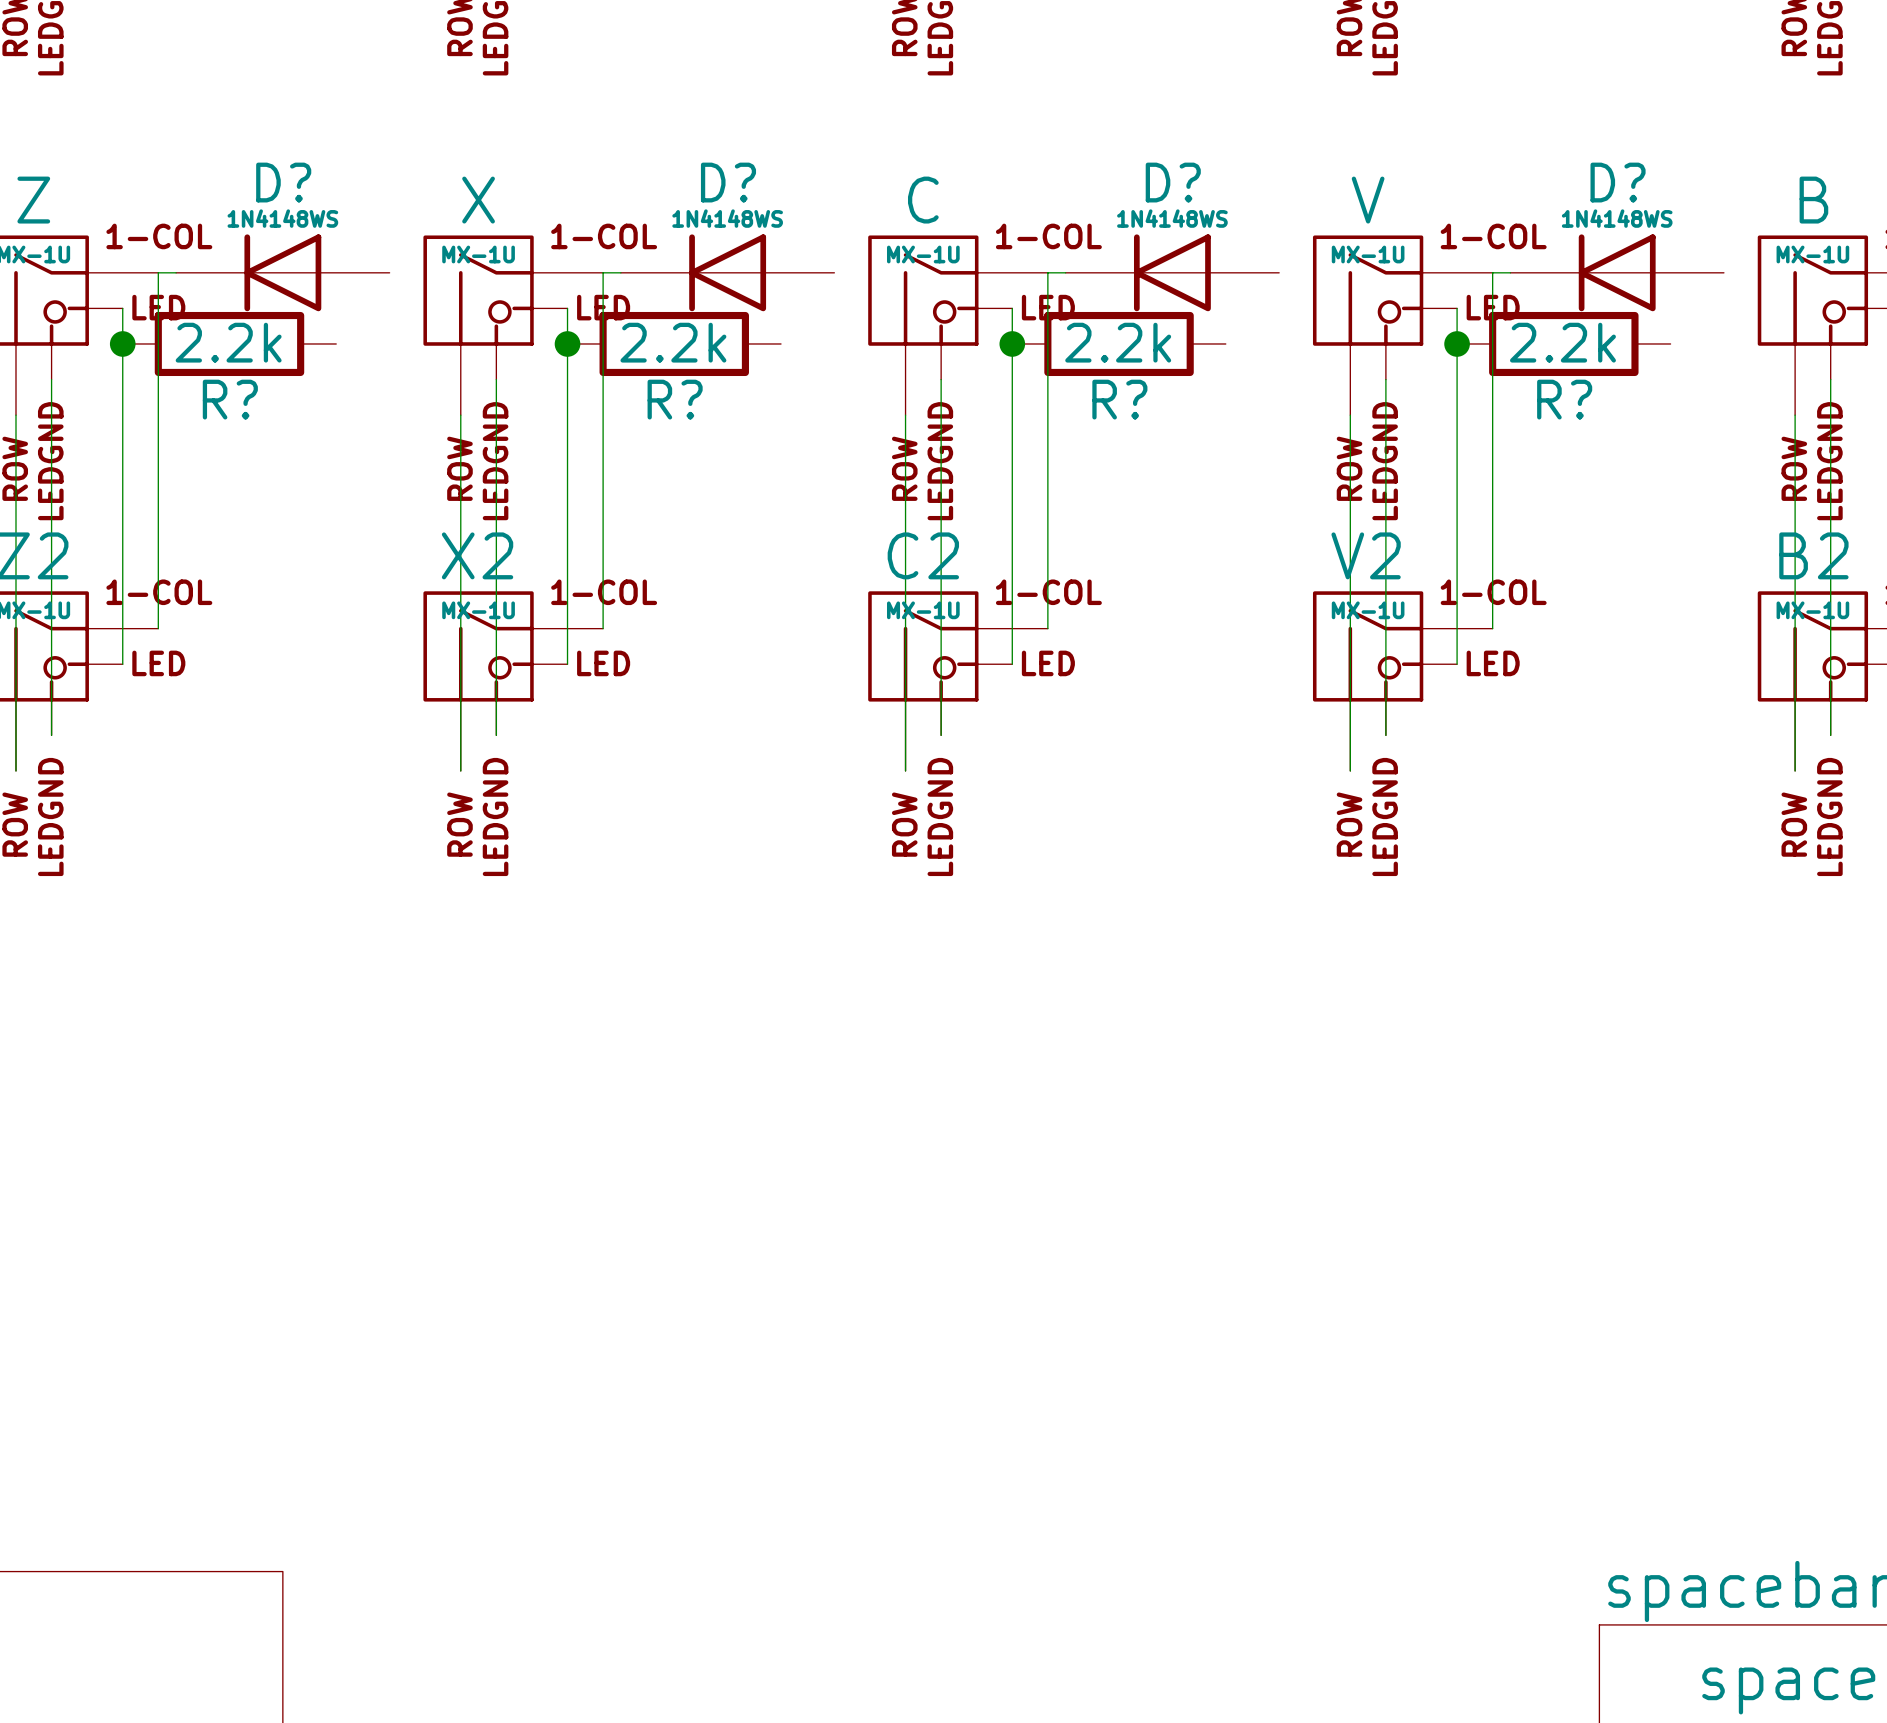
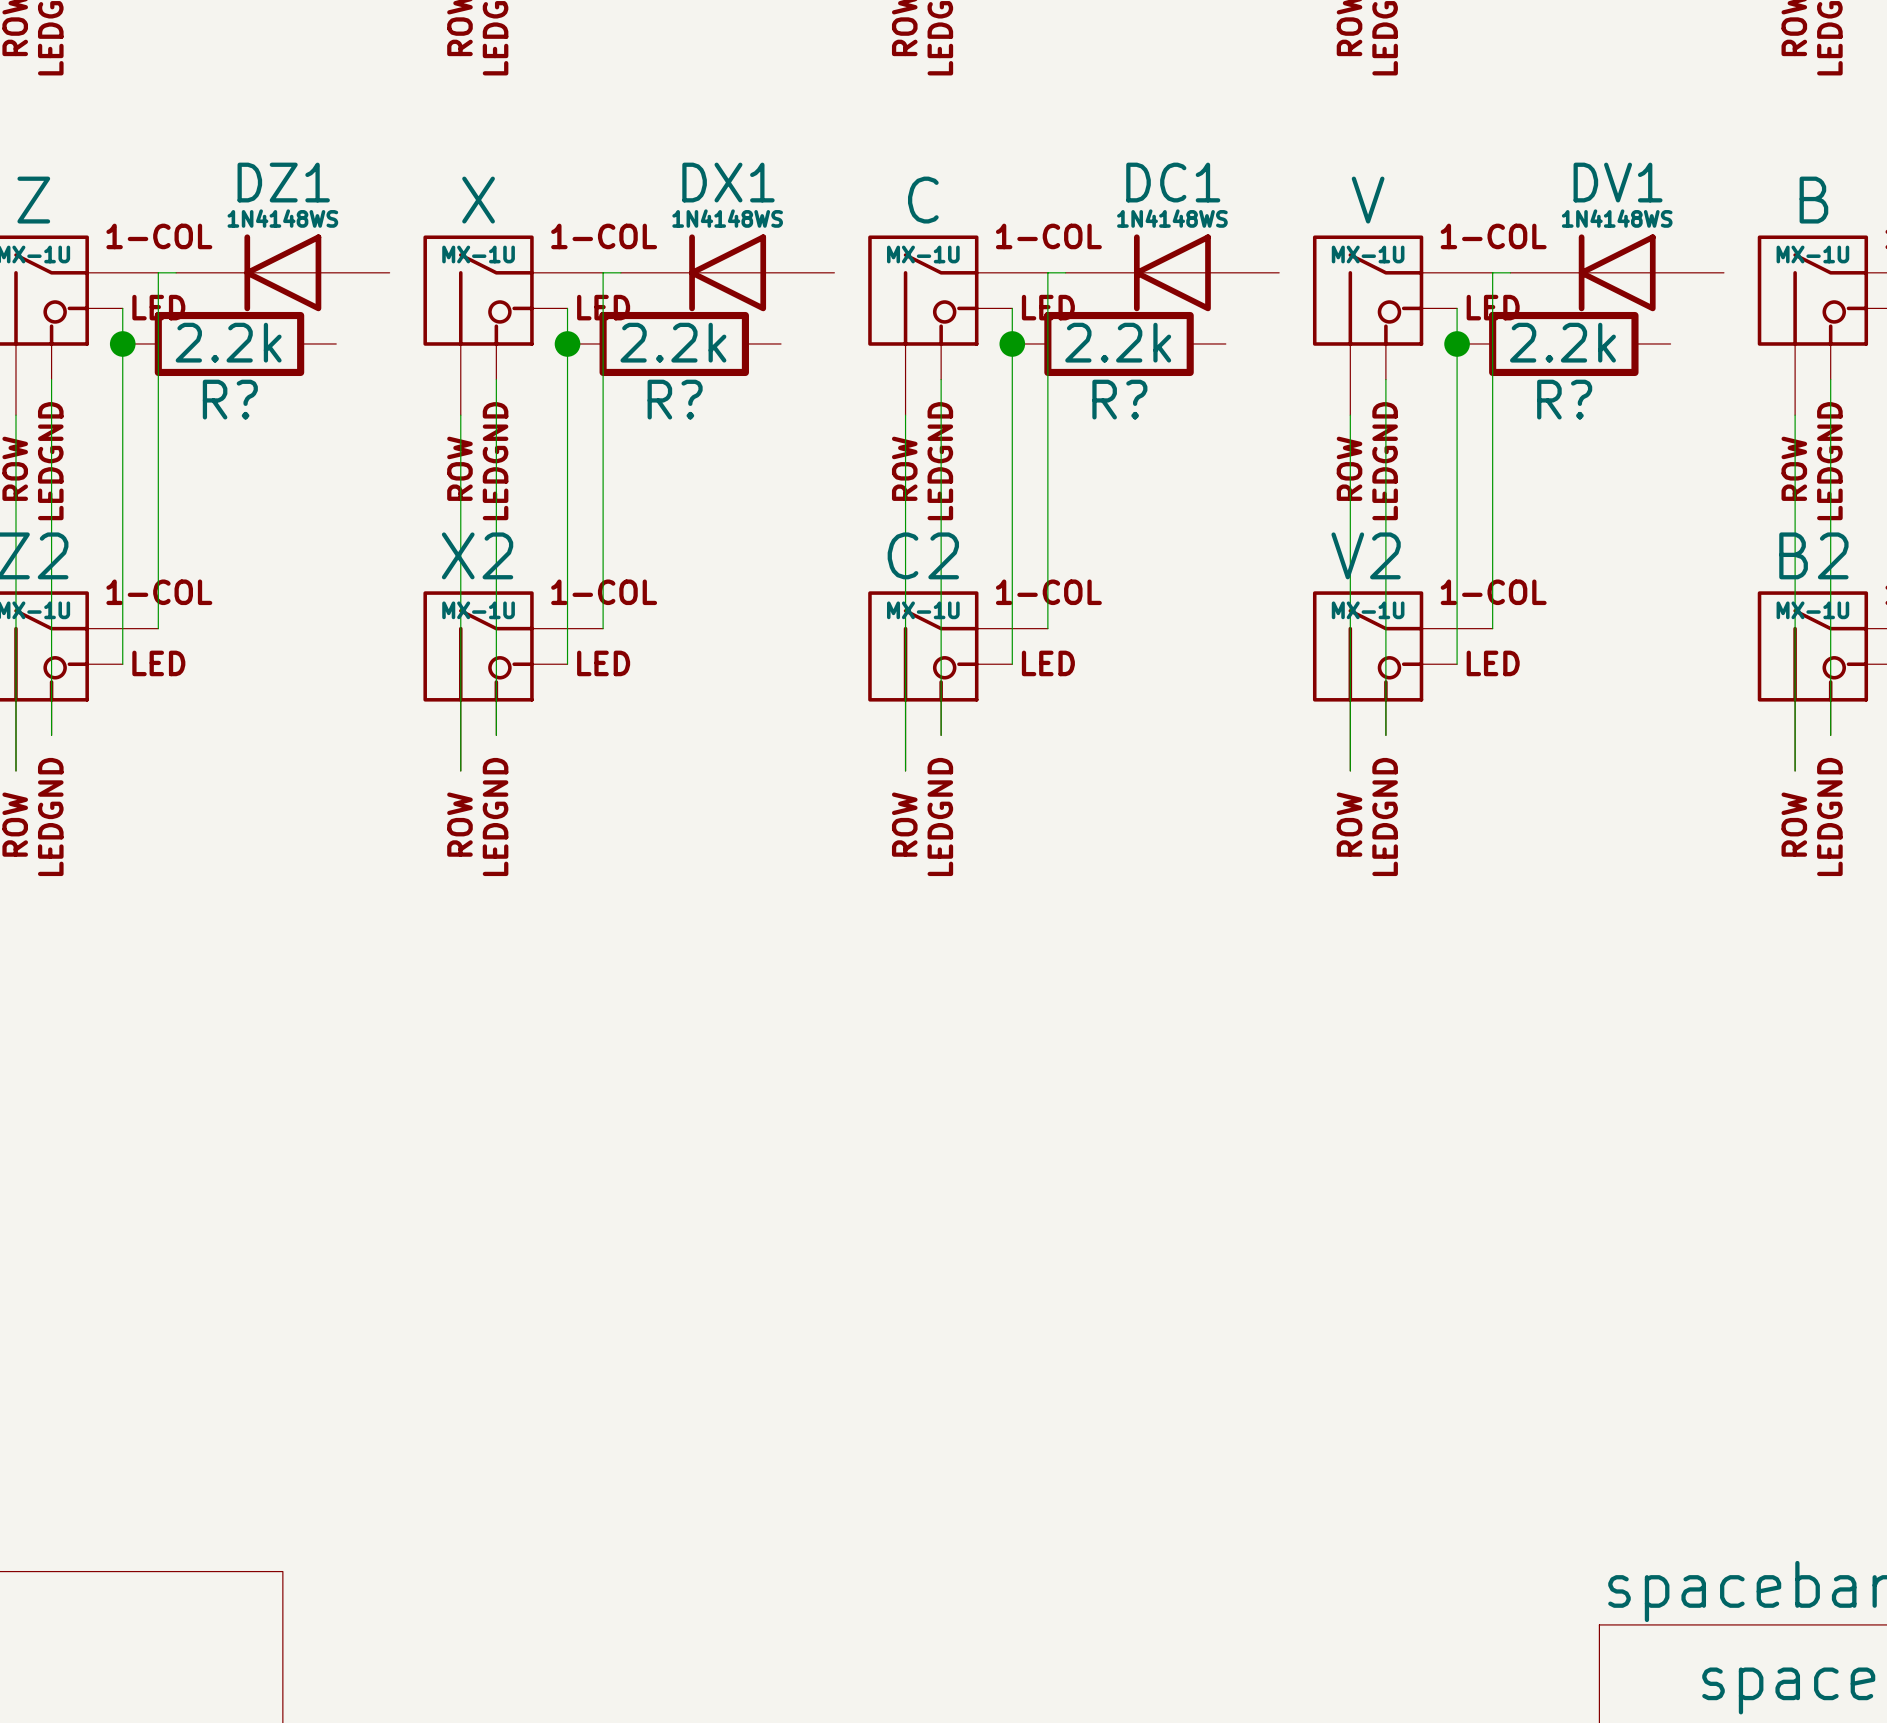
D? name: D? (283, 182) -> DZ1 (283, 182)
D? name: D? (728, 182) -> DX1 (728, 182)
D? name: D? (1173, 182) -> DC1 (1173, 182)
D? name: D? (1618, 182) -> DV1 (1618, 182)

